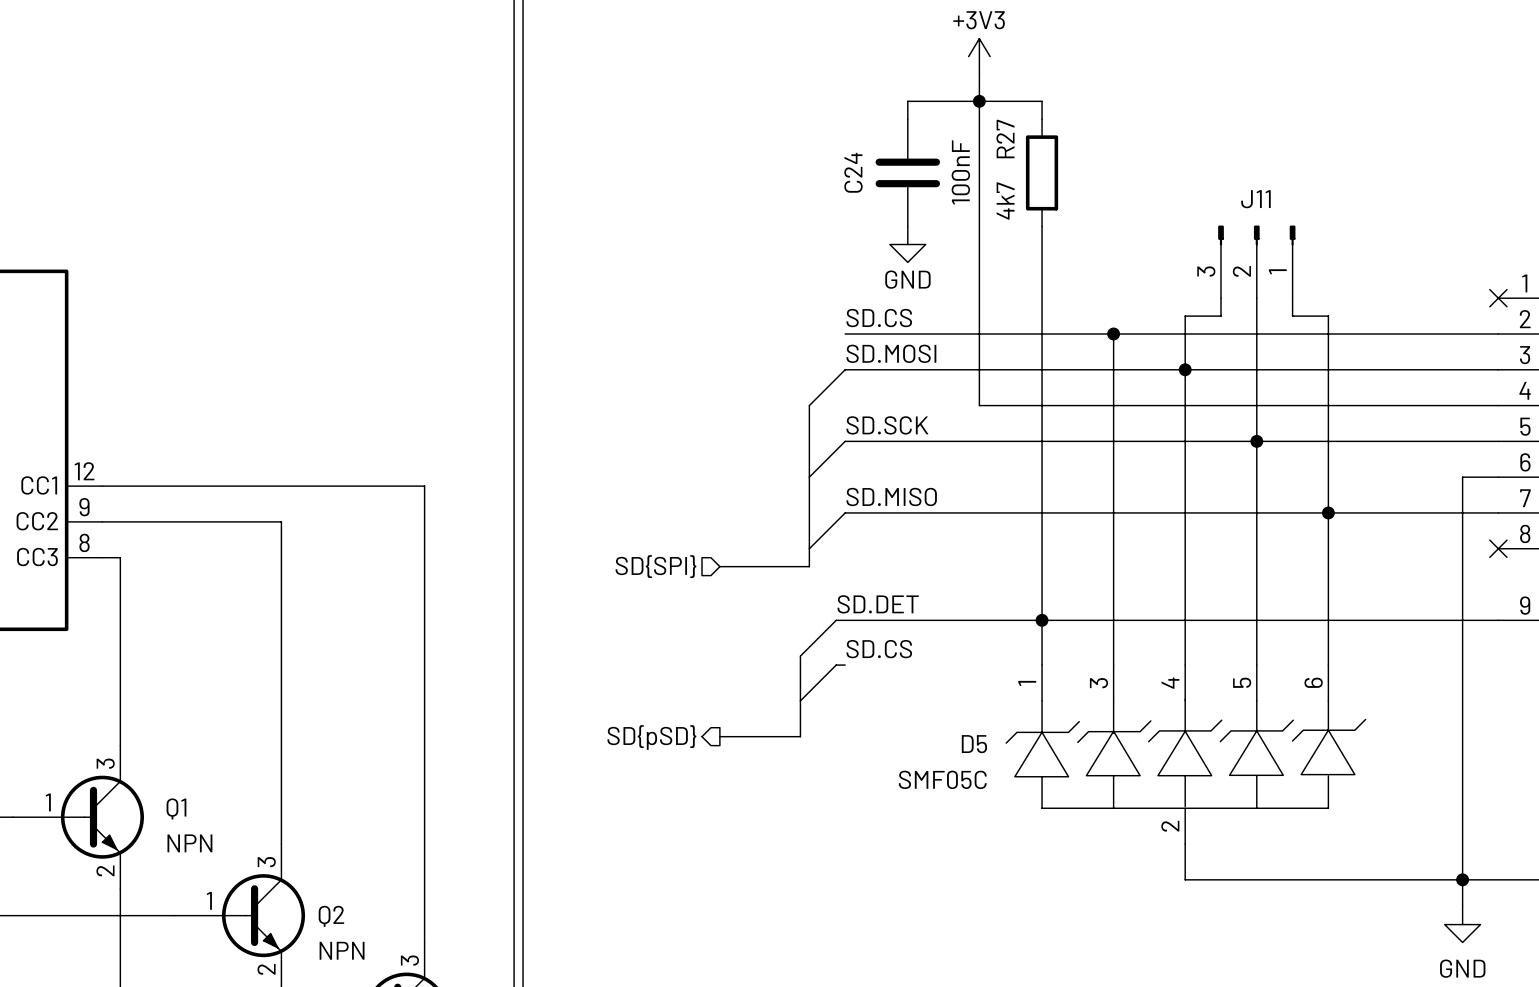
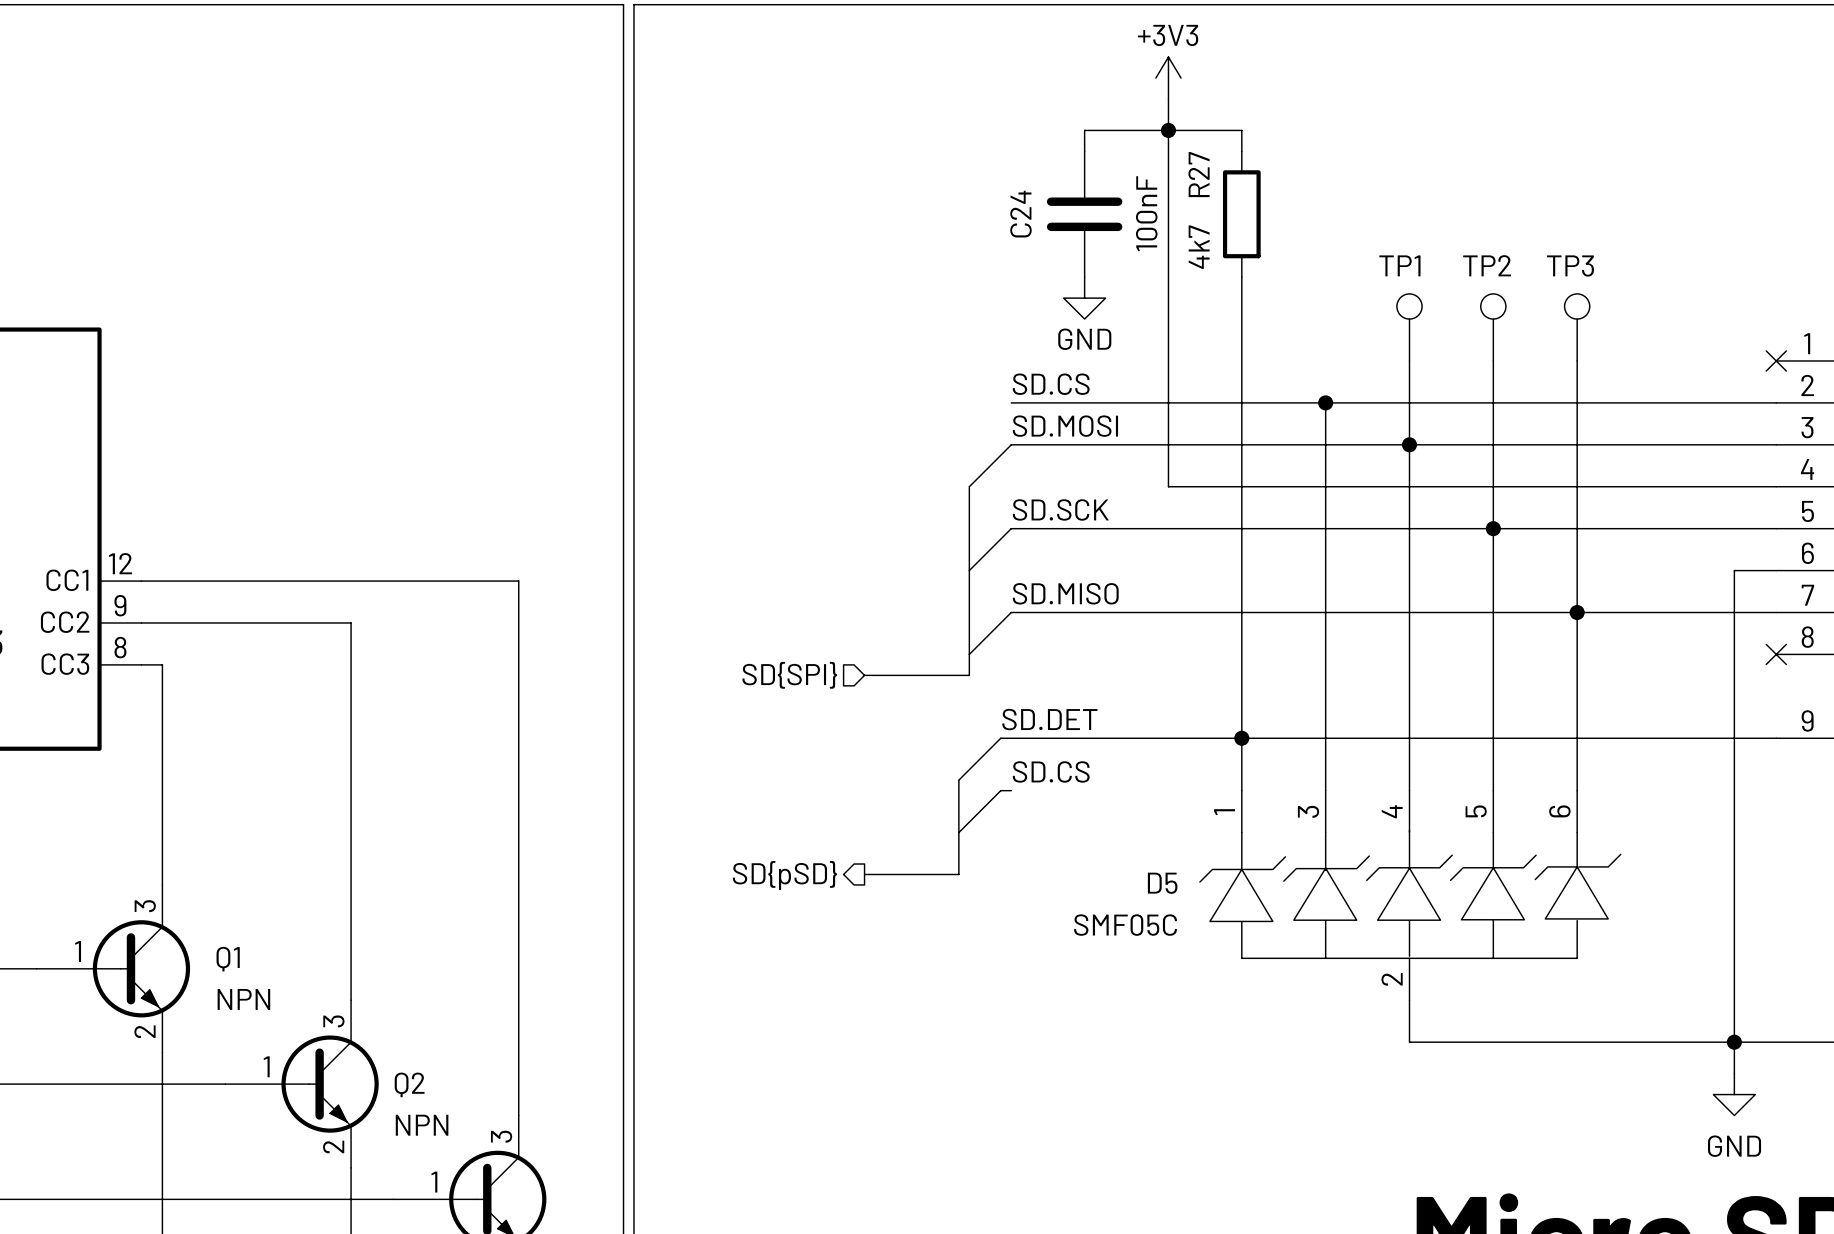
J11: (1256, 261) -> none
TP1: none -> (1409, 327)
TP2: none -> (1493, 327)
TP3: none -> (1577, 327)
wire: (1221, 298) (1221, 316) (1185, 316) -> (1409, 360) (1409, 381)
wire: (1292, 298) (1292, 316) (1328, 316) -> (1577, 360) (1577, 381)

